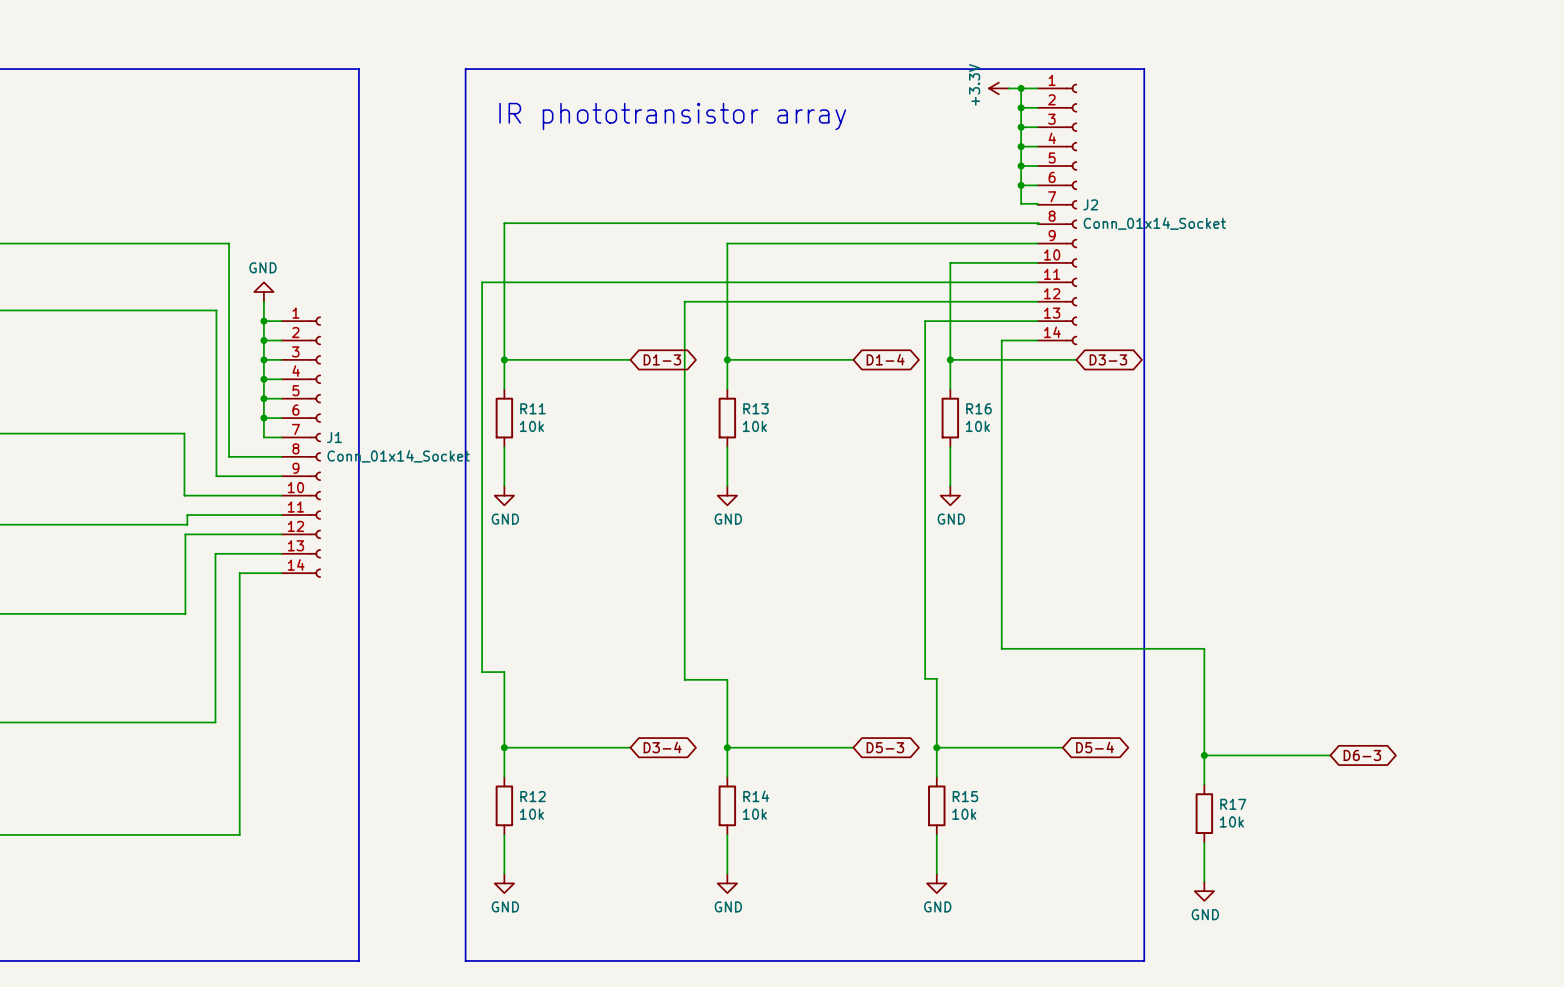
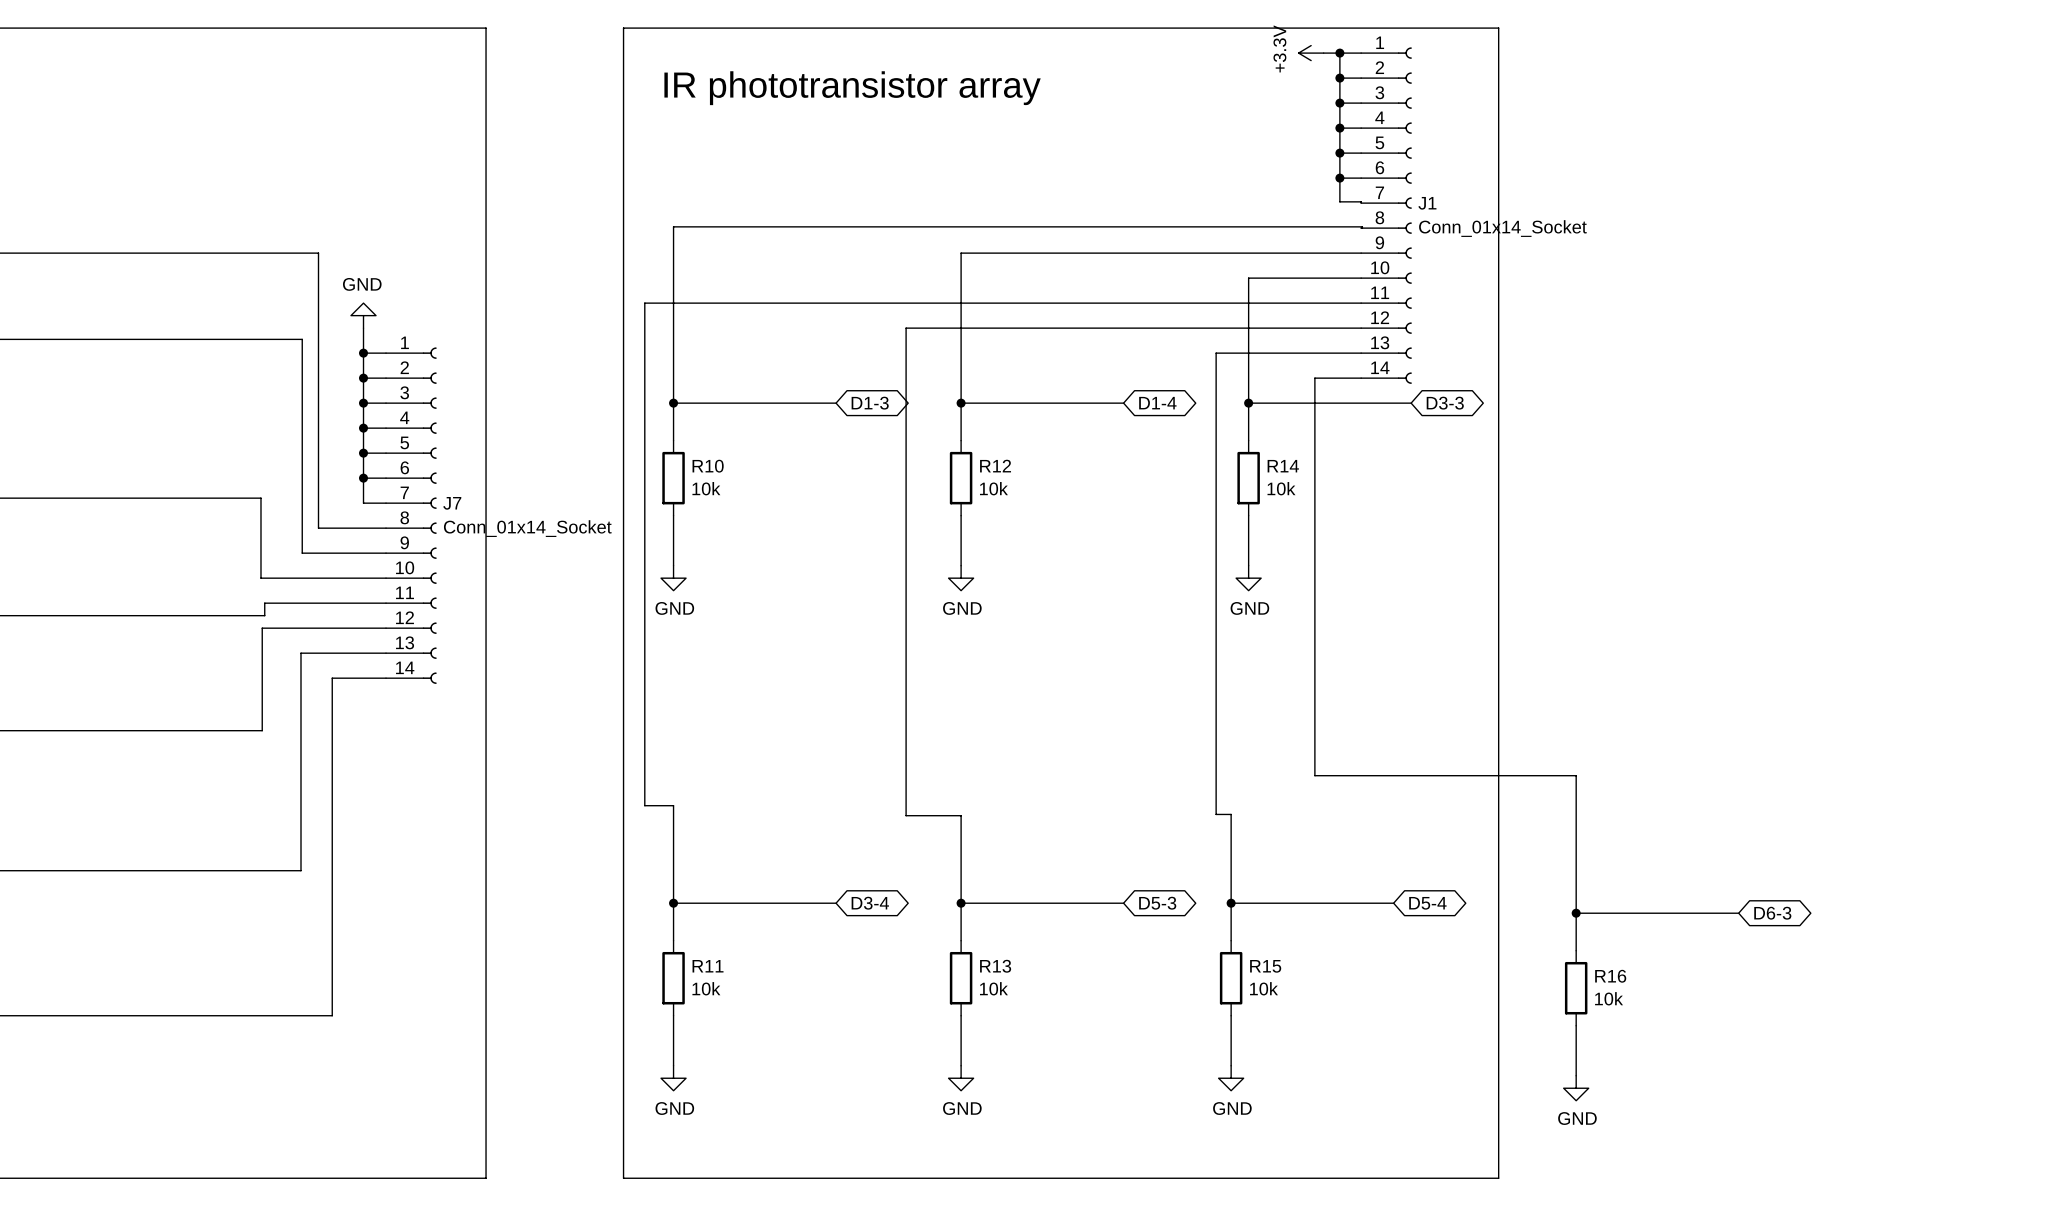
J2 name: J2 (1090, 204) -> J1 (1427, 203)
R11 name: R11 (533, 408) -> R10 (708, 466)
R13 name: R13 (756, 408) -> R12 (995, 466)
R16 name: R16 (979, 408) -> R14 (1283, 466)
J1 name: J1 (334, 437) -> J7 (452, 503)
R12 name: R12 (533, 796) -> R11 (708, 966)
R14 name: R14 (756, 796) -> R13 (995, 966)
R17 name: R17 (1233, 804) -> R16 (1610, 976)

